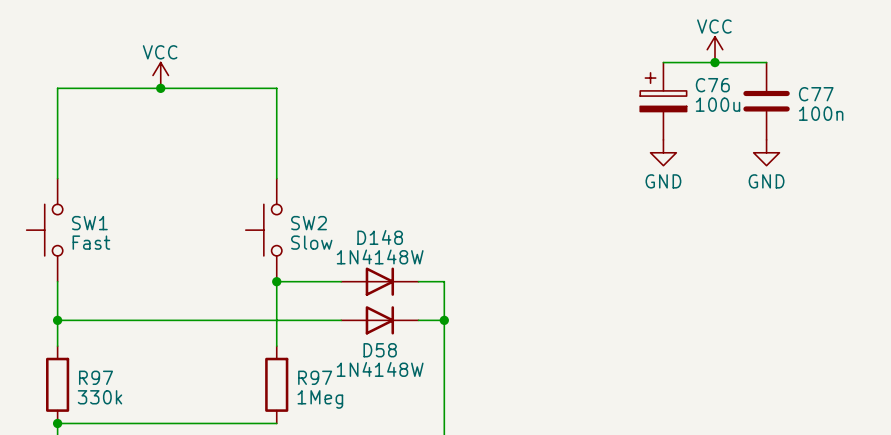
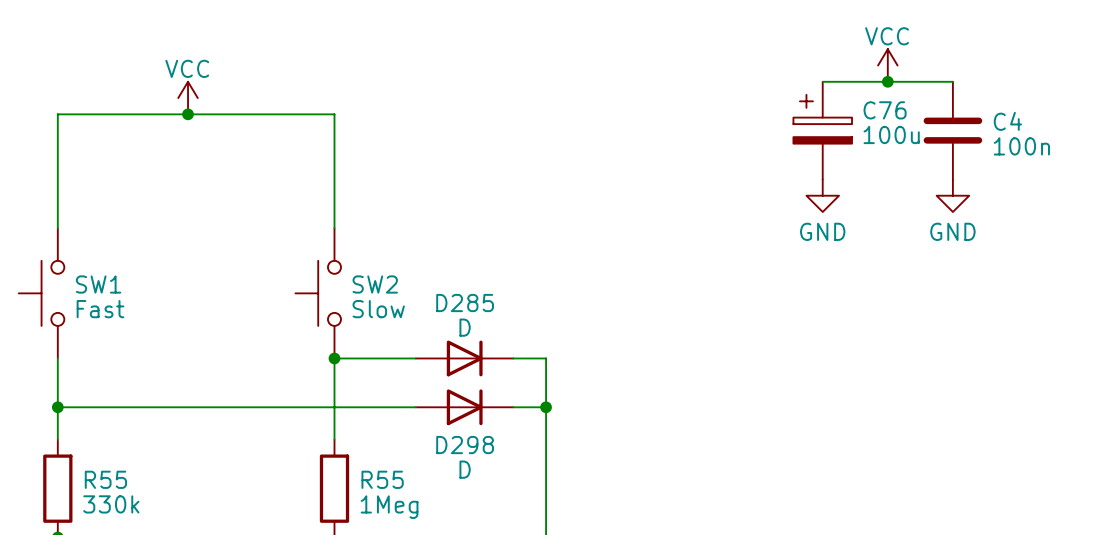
C77 name: C77 (816, 94) -> C4 (1007, 121)
D148 name: D148 (380, 237) -> D285 (465, 303)
D148 value: 1N4148W (380, 256) -> D (465, 327)
D58 name: D58 (380, 350) -> D298 (465, 445)
D58 value: 1N4148W (380, 369) -> D (465, 469)
R97 name: R97 (96, 377) -> R55 (105, 479)
R97 name: R97 (315, 377) -> R55 (382, 479)

